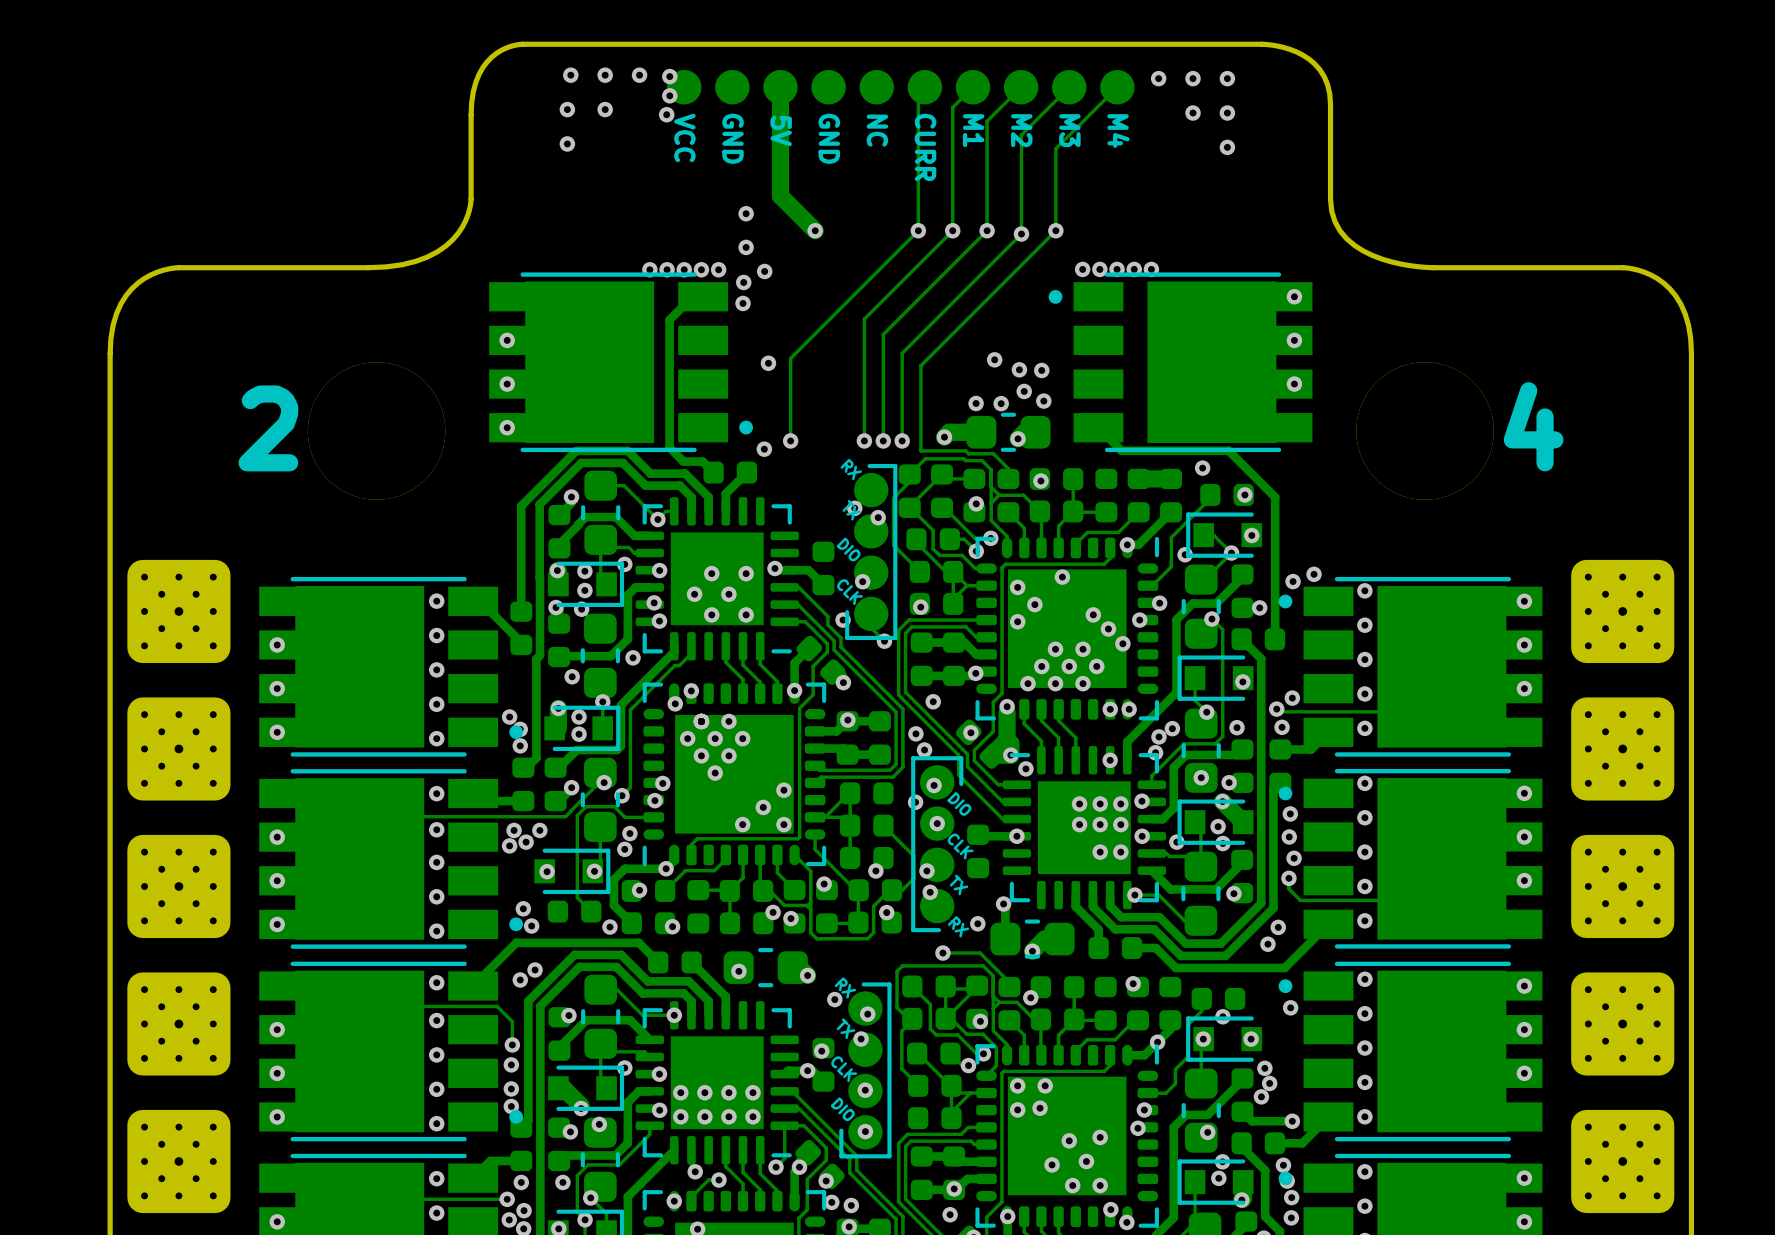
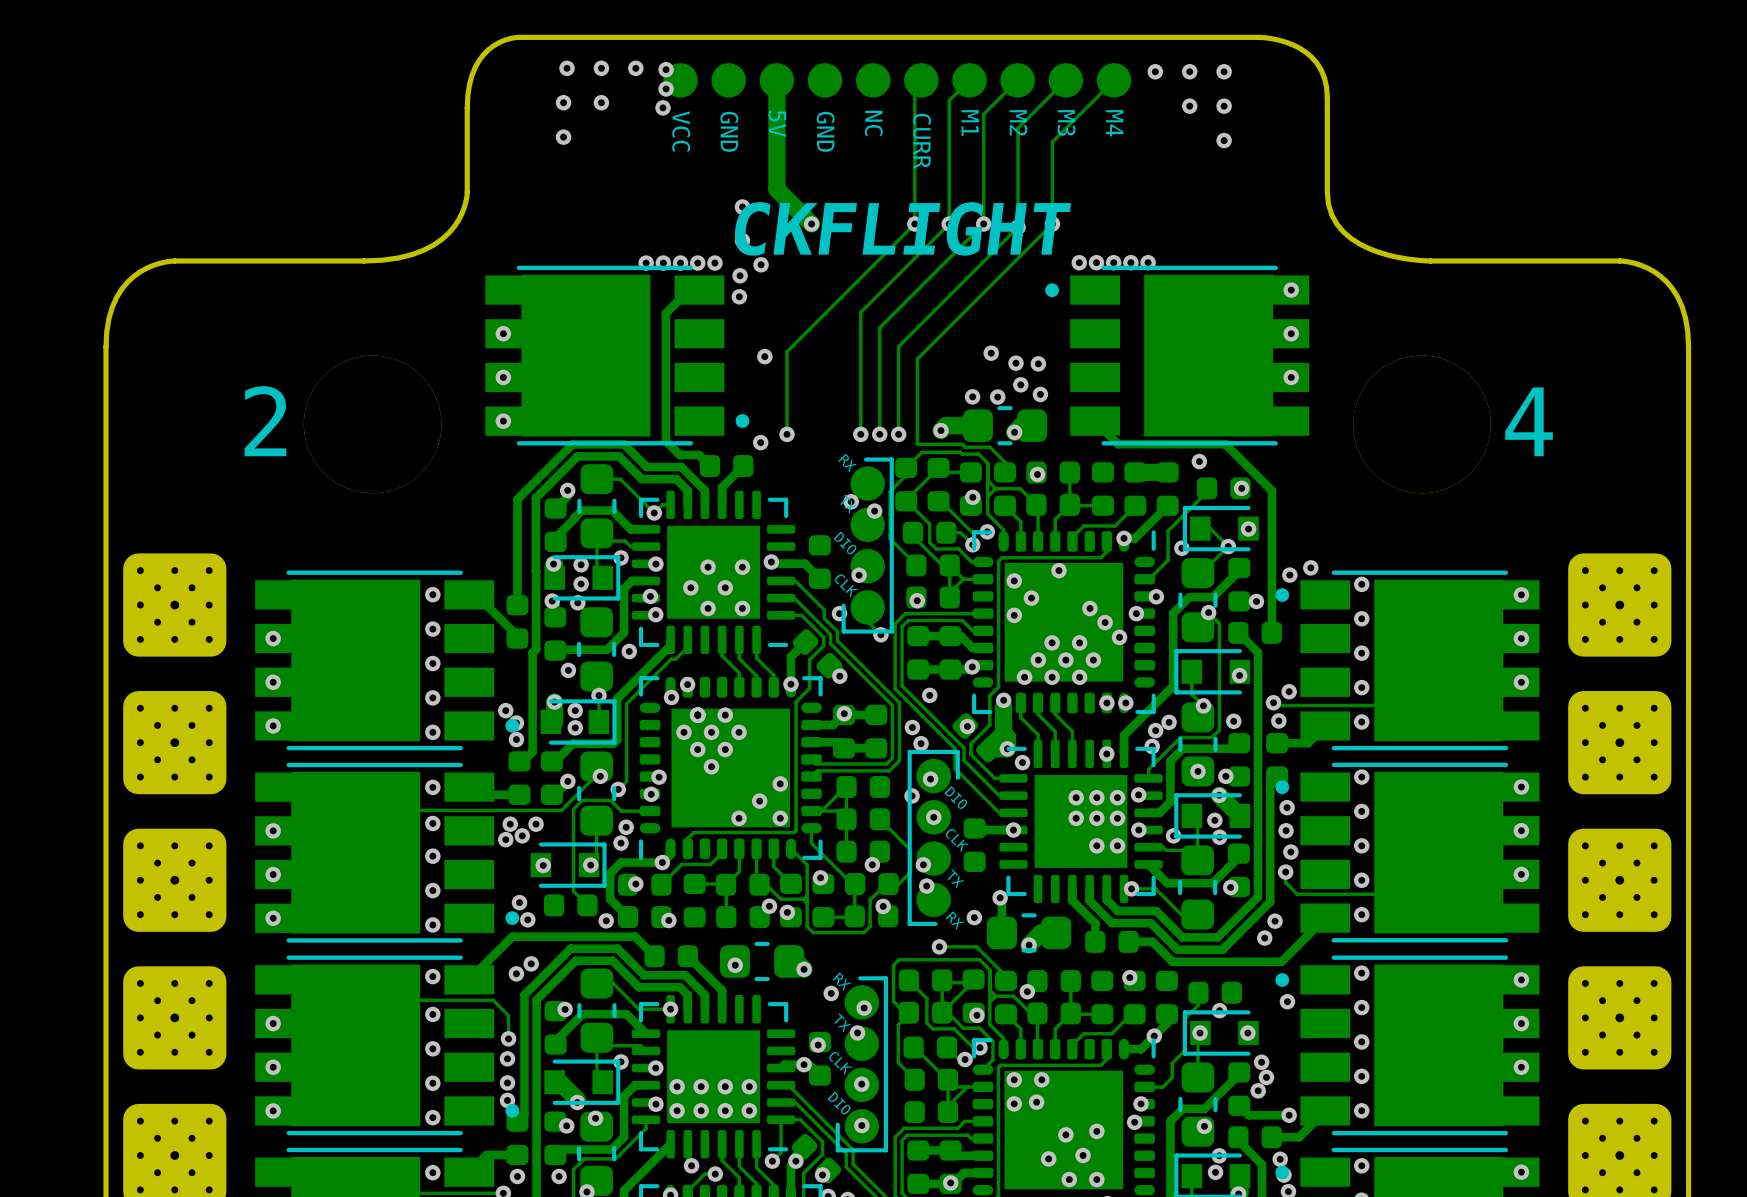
text: none -> CKFLIGHT (902, 228)

